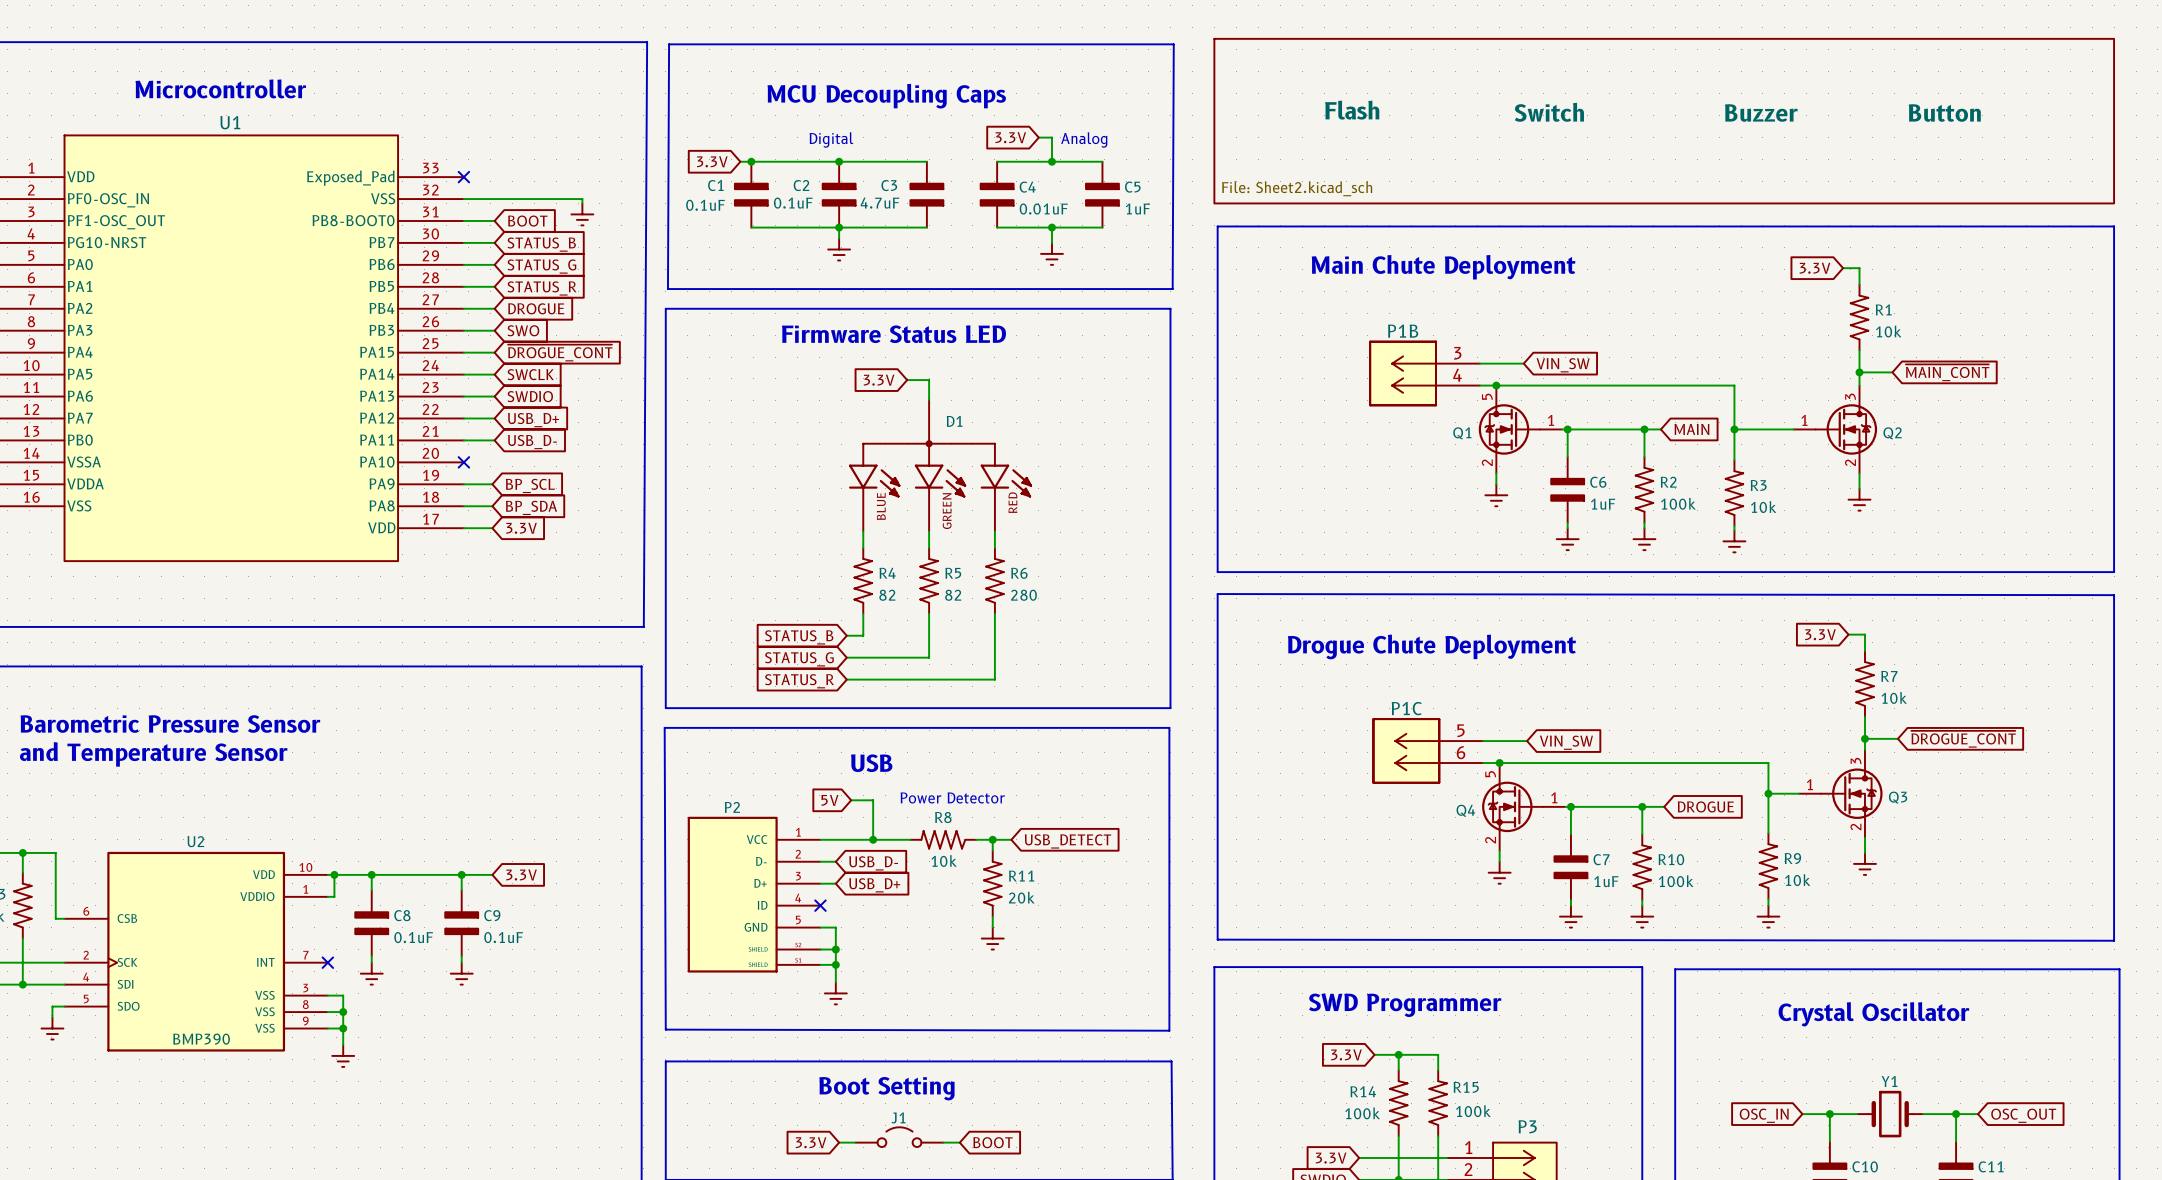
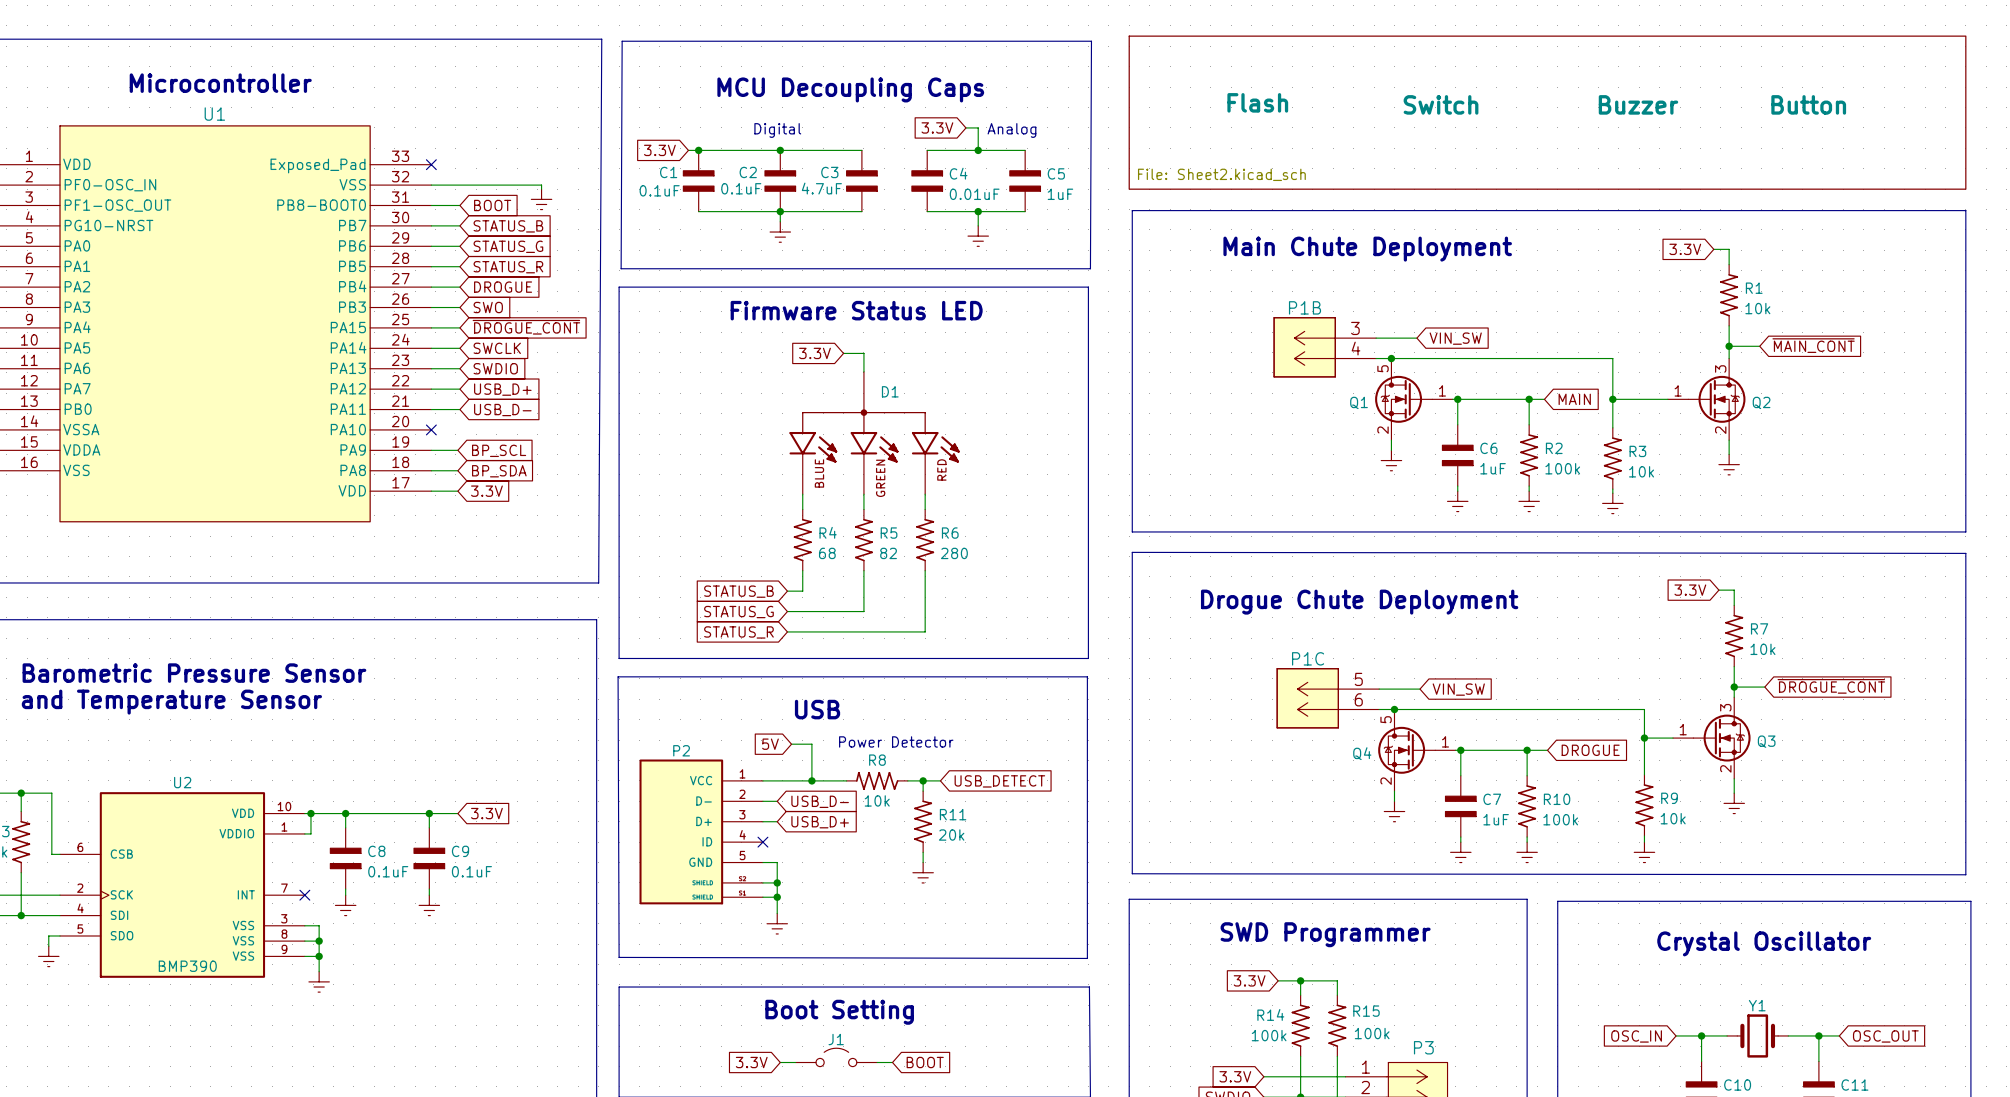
R4 value: 82 (887, 595) -> 68 (827, 553)

